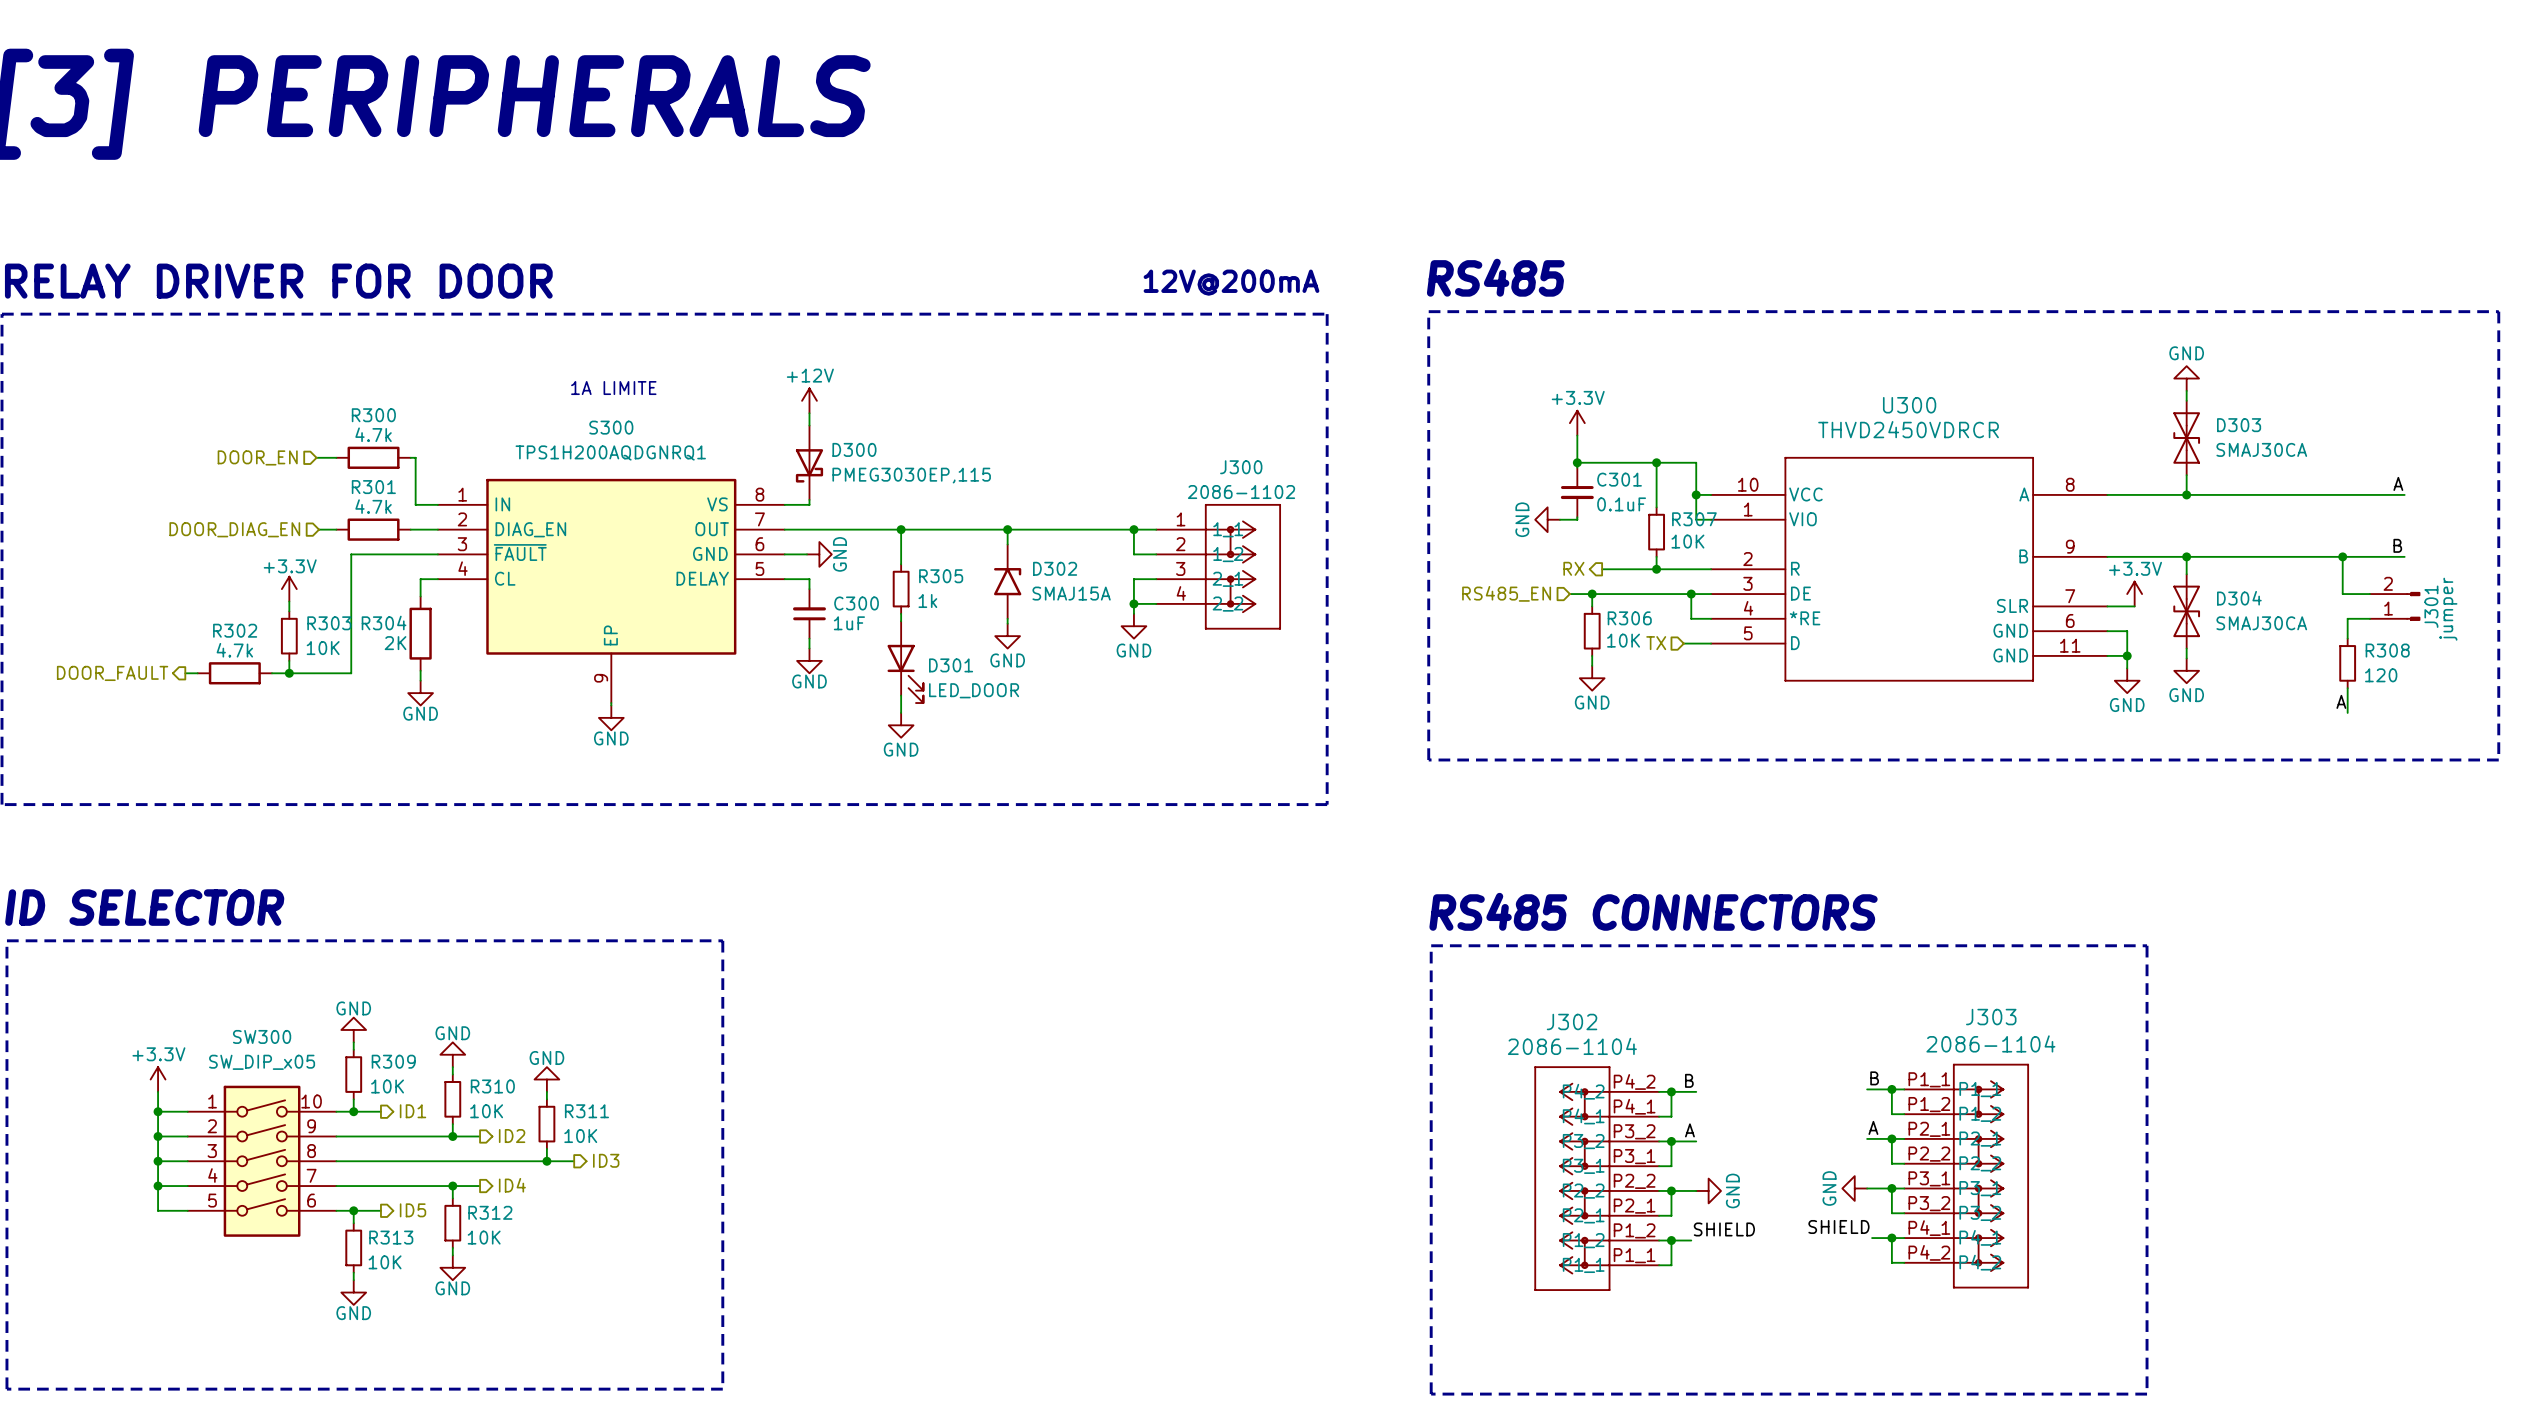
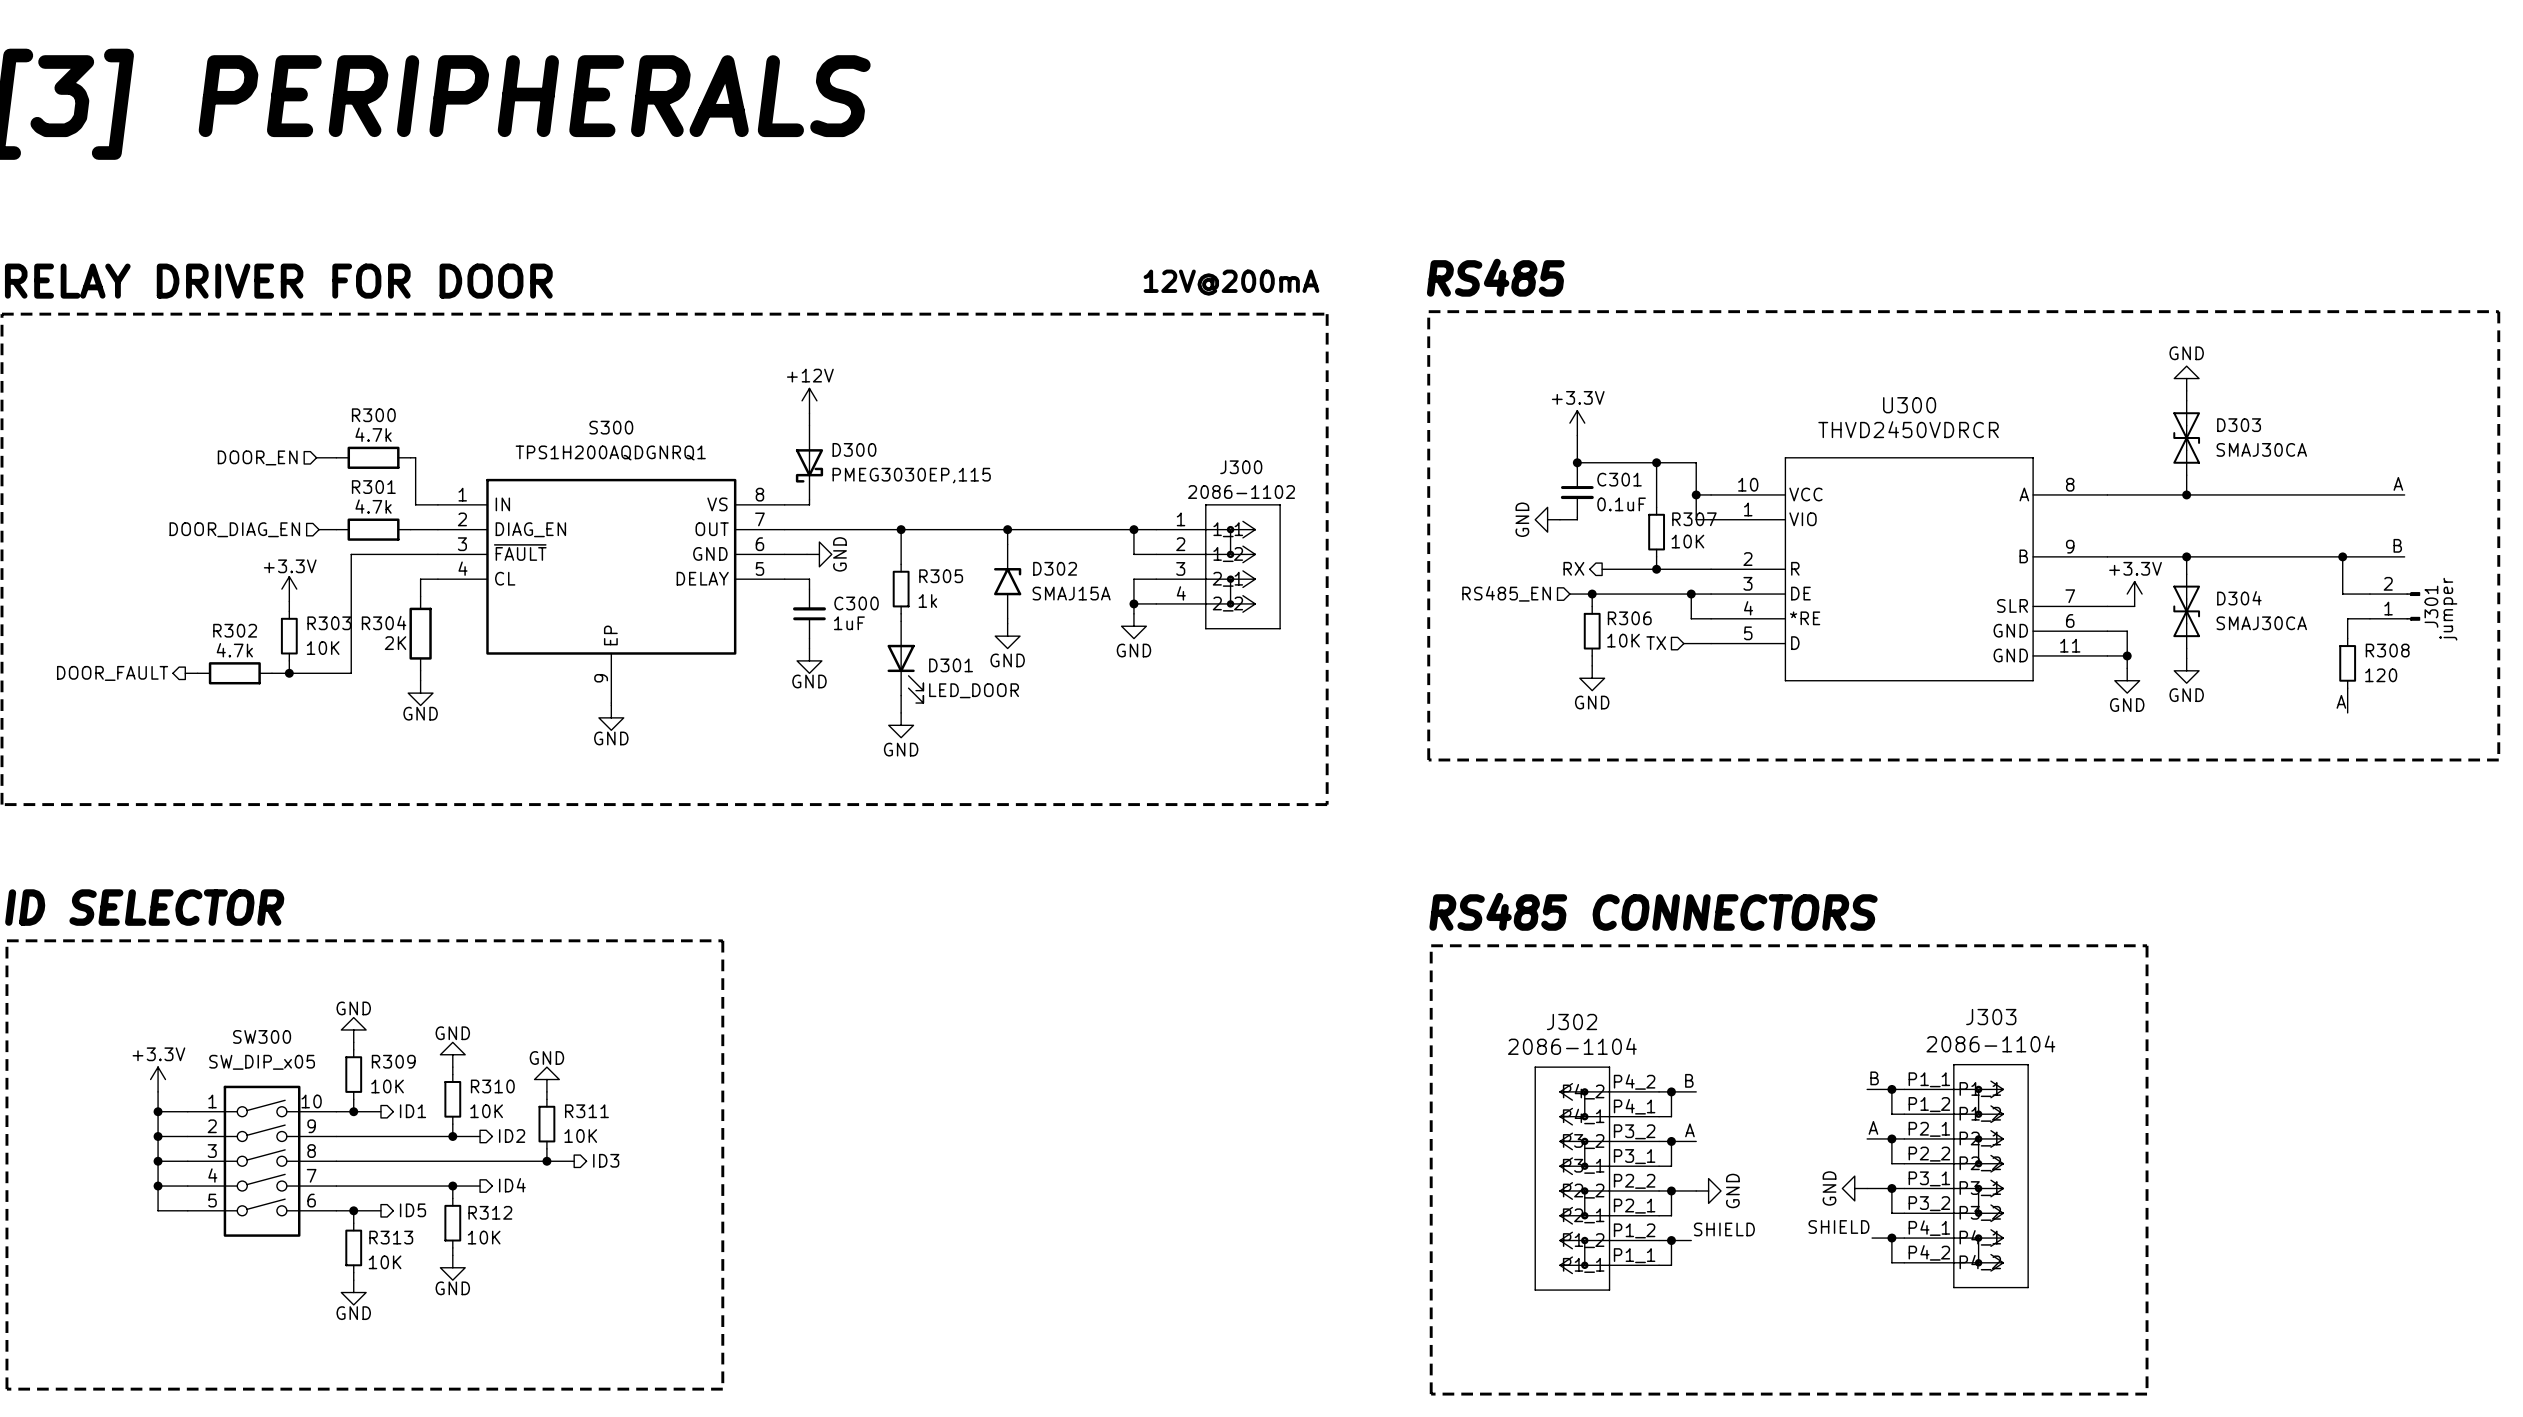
text: 1A LIMITE (613, 388) -> none

